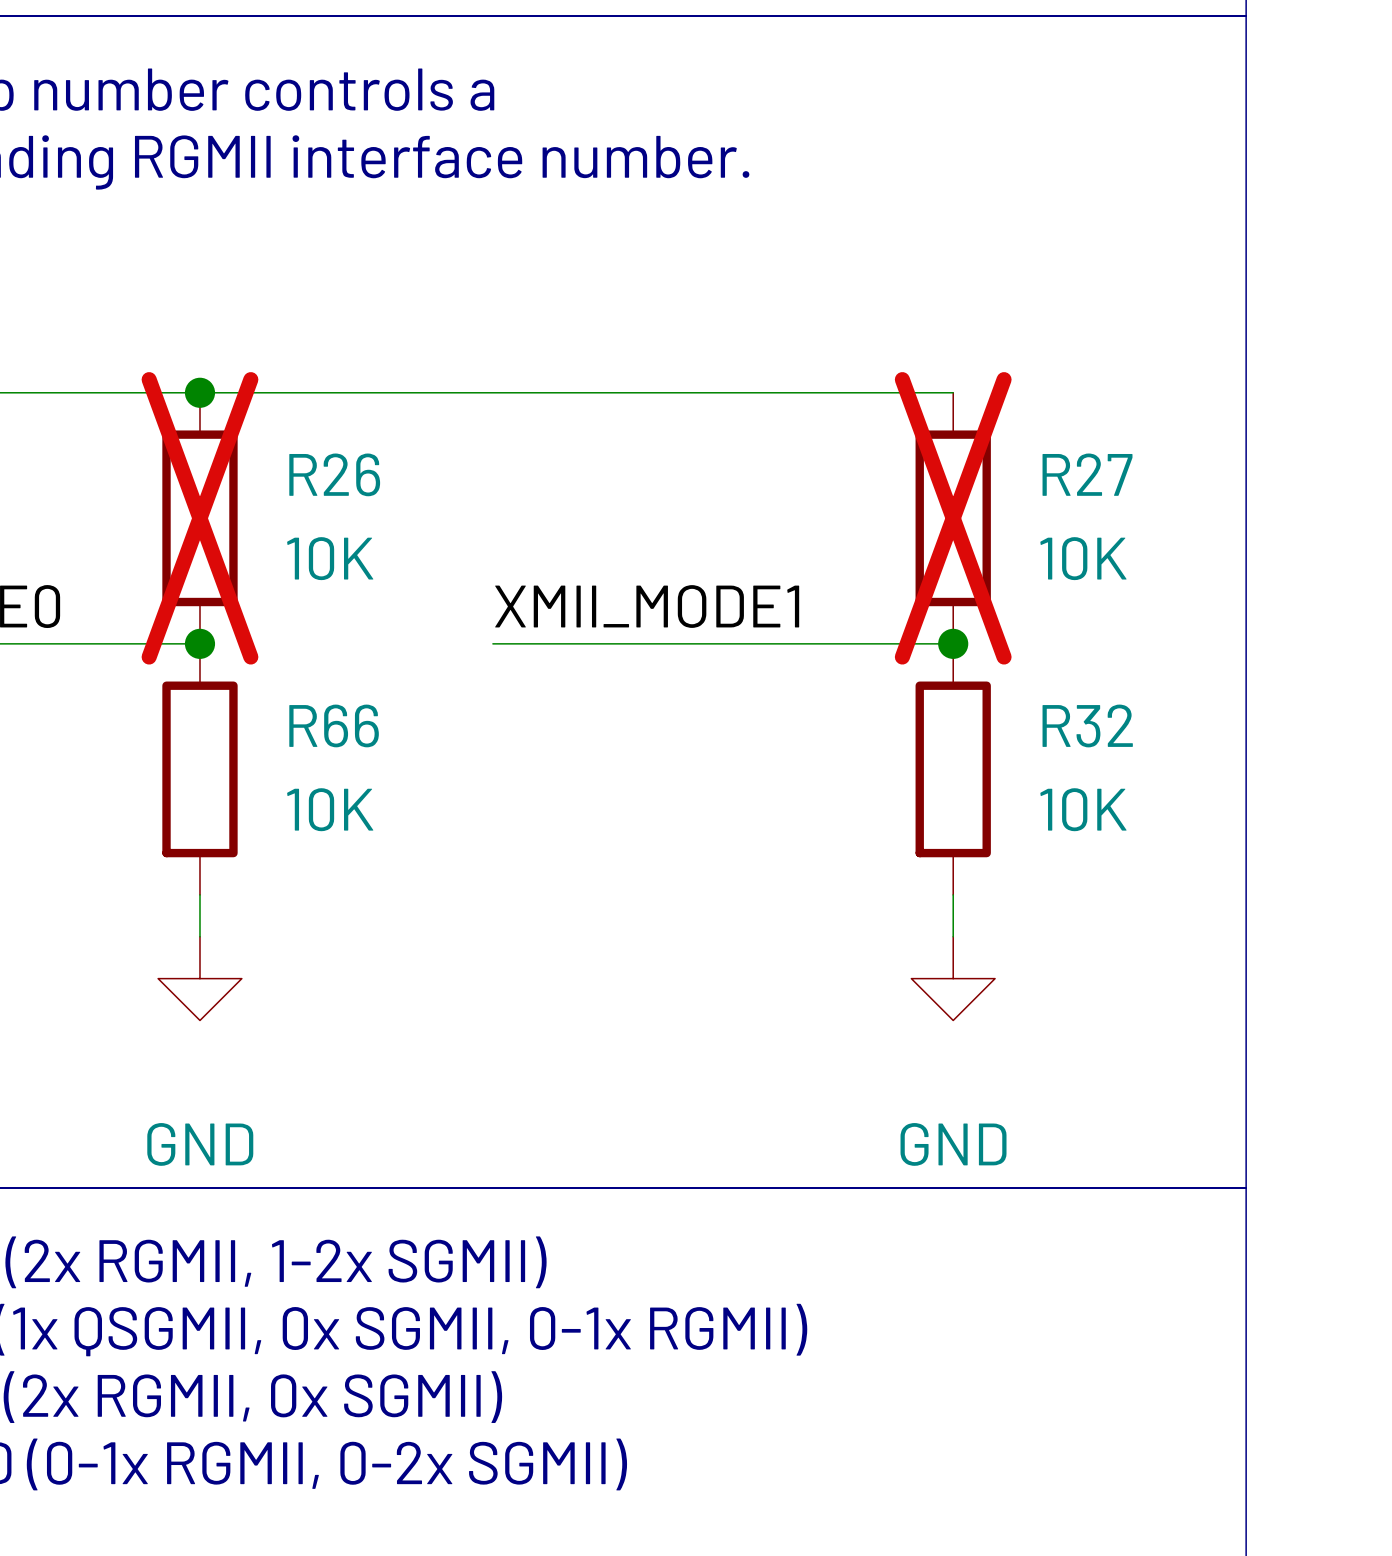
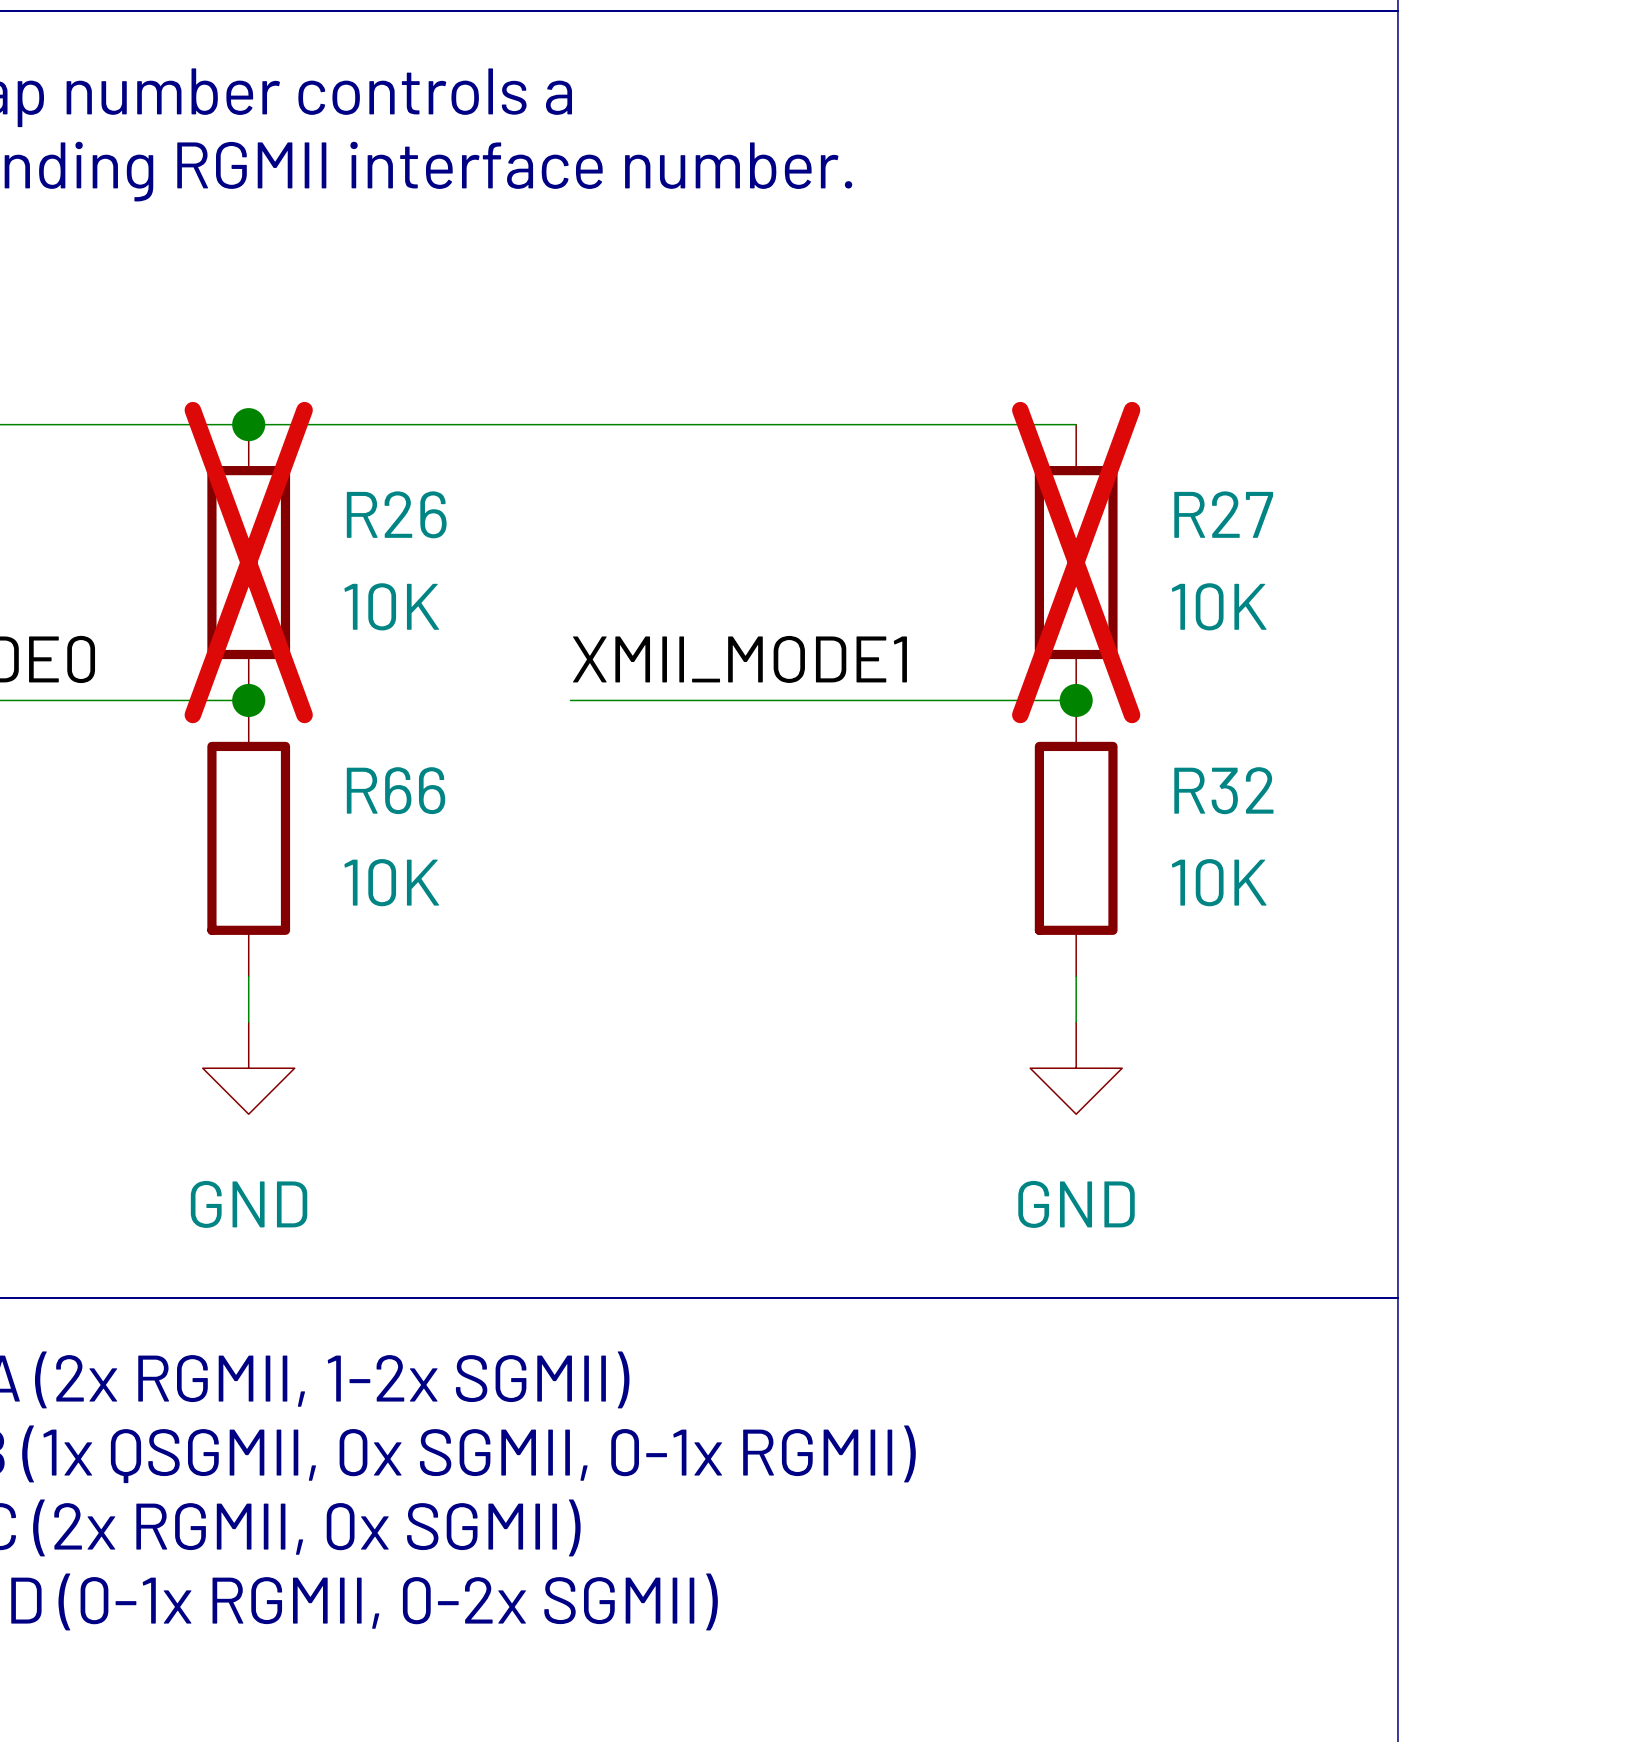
power symbol text position: GND (200, 1144) -> GND (249, 1204)
power symbol text position: GND (953, 1144) -> GND (1076, 1204)

